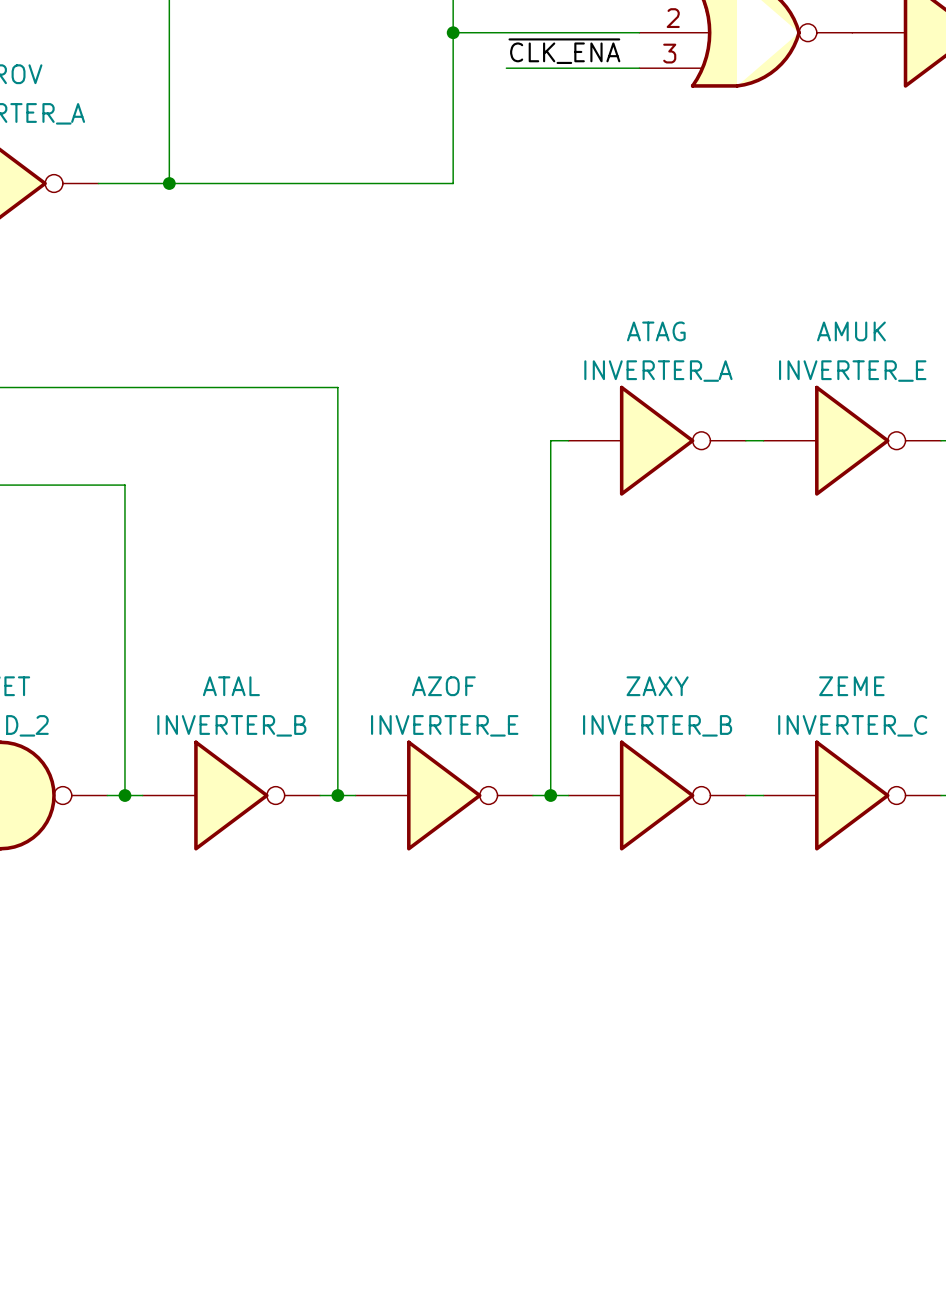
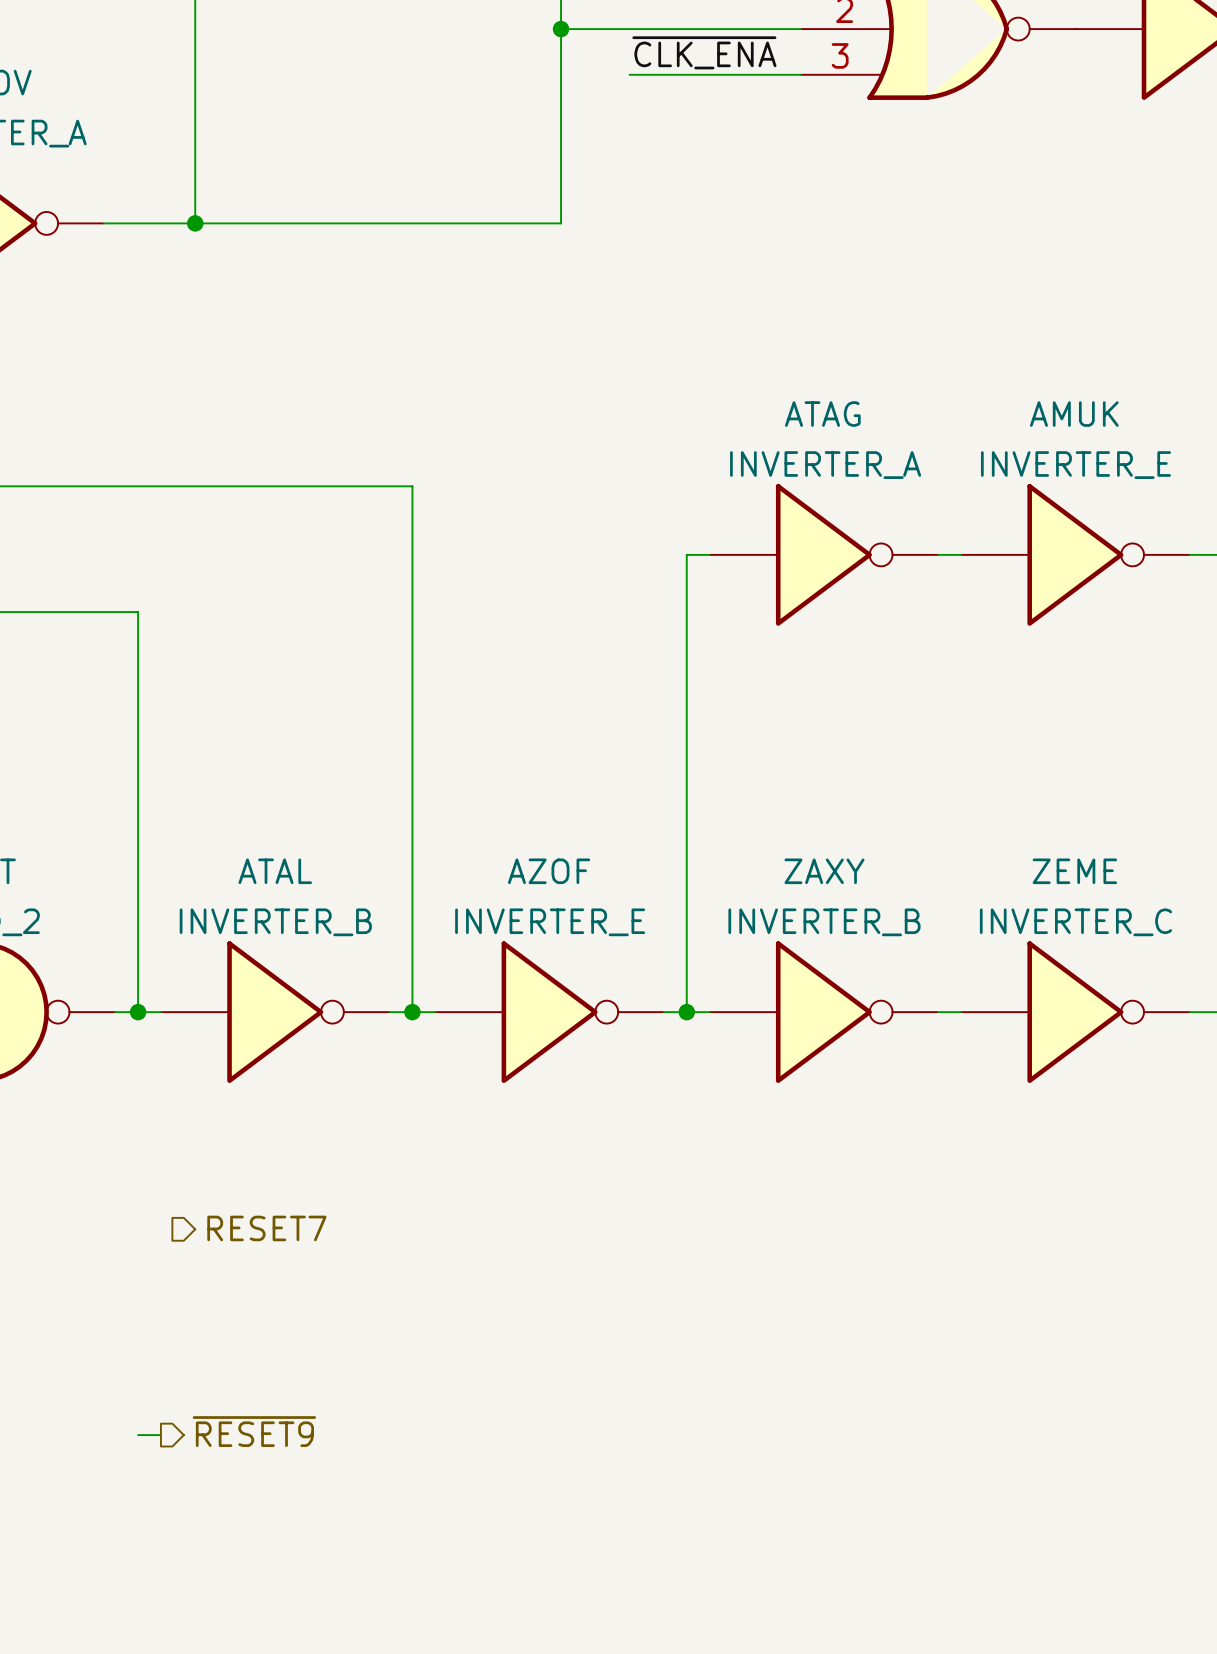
hierarchical label: none -> RESET7 (266, 1228)
hierarchical label: none -> ~{RESET9} (254, 1431)
wire: none -> (138, 1435) (160, 1435)

